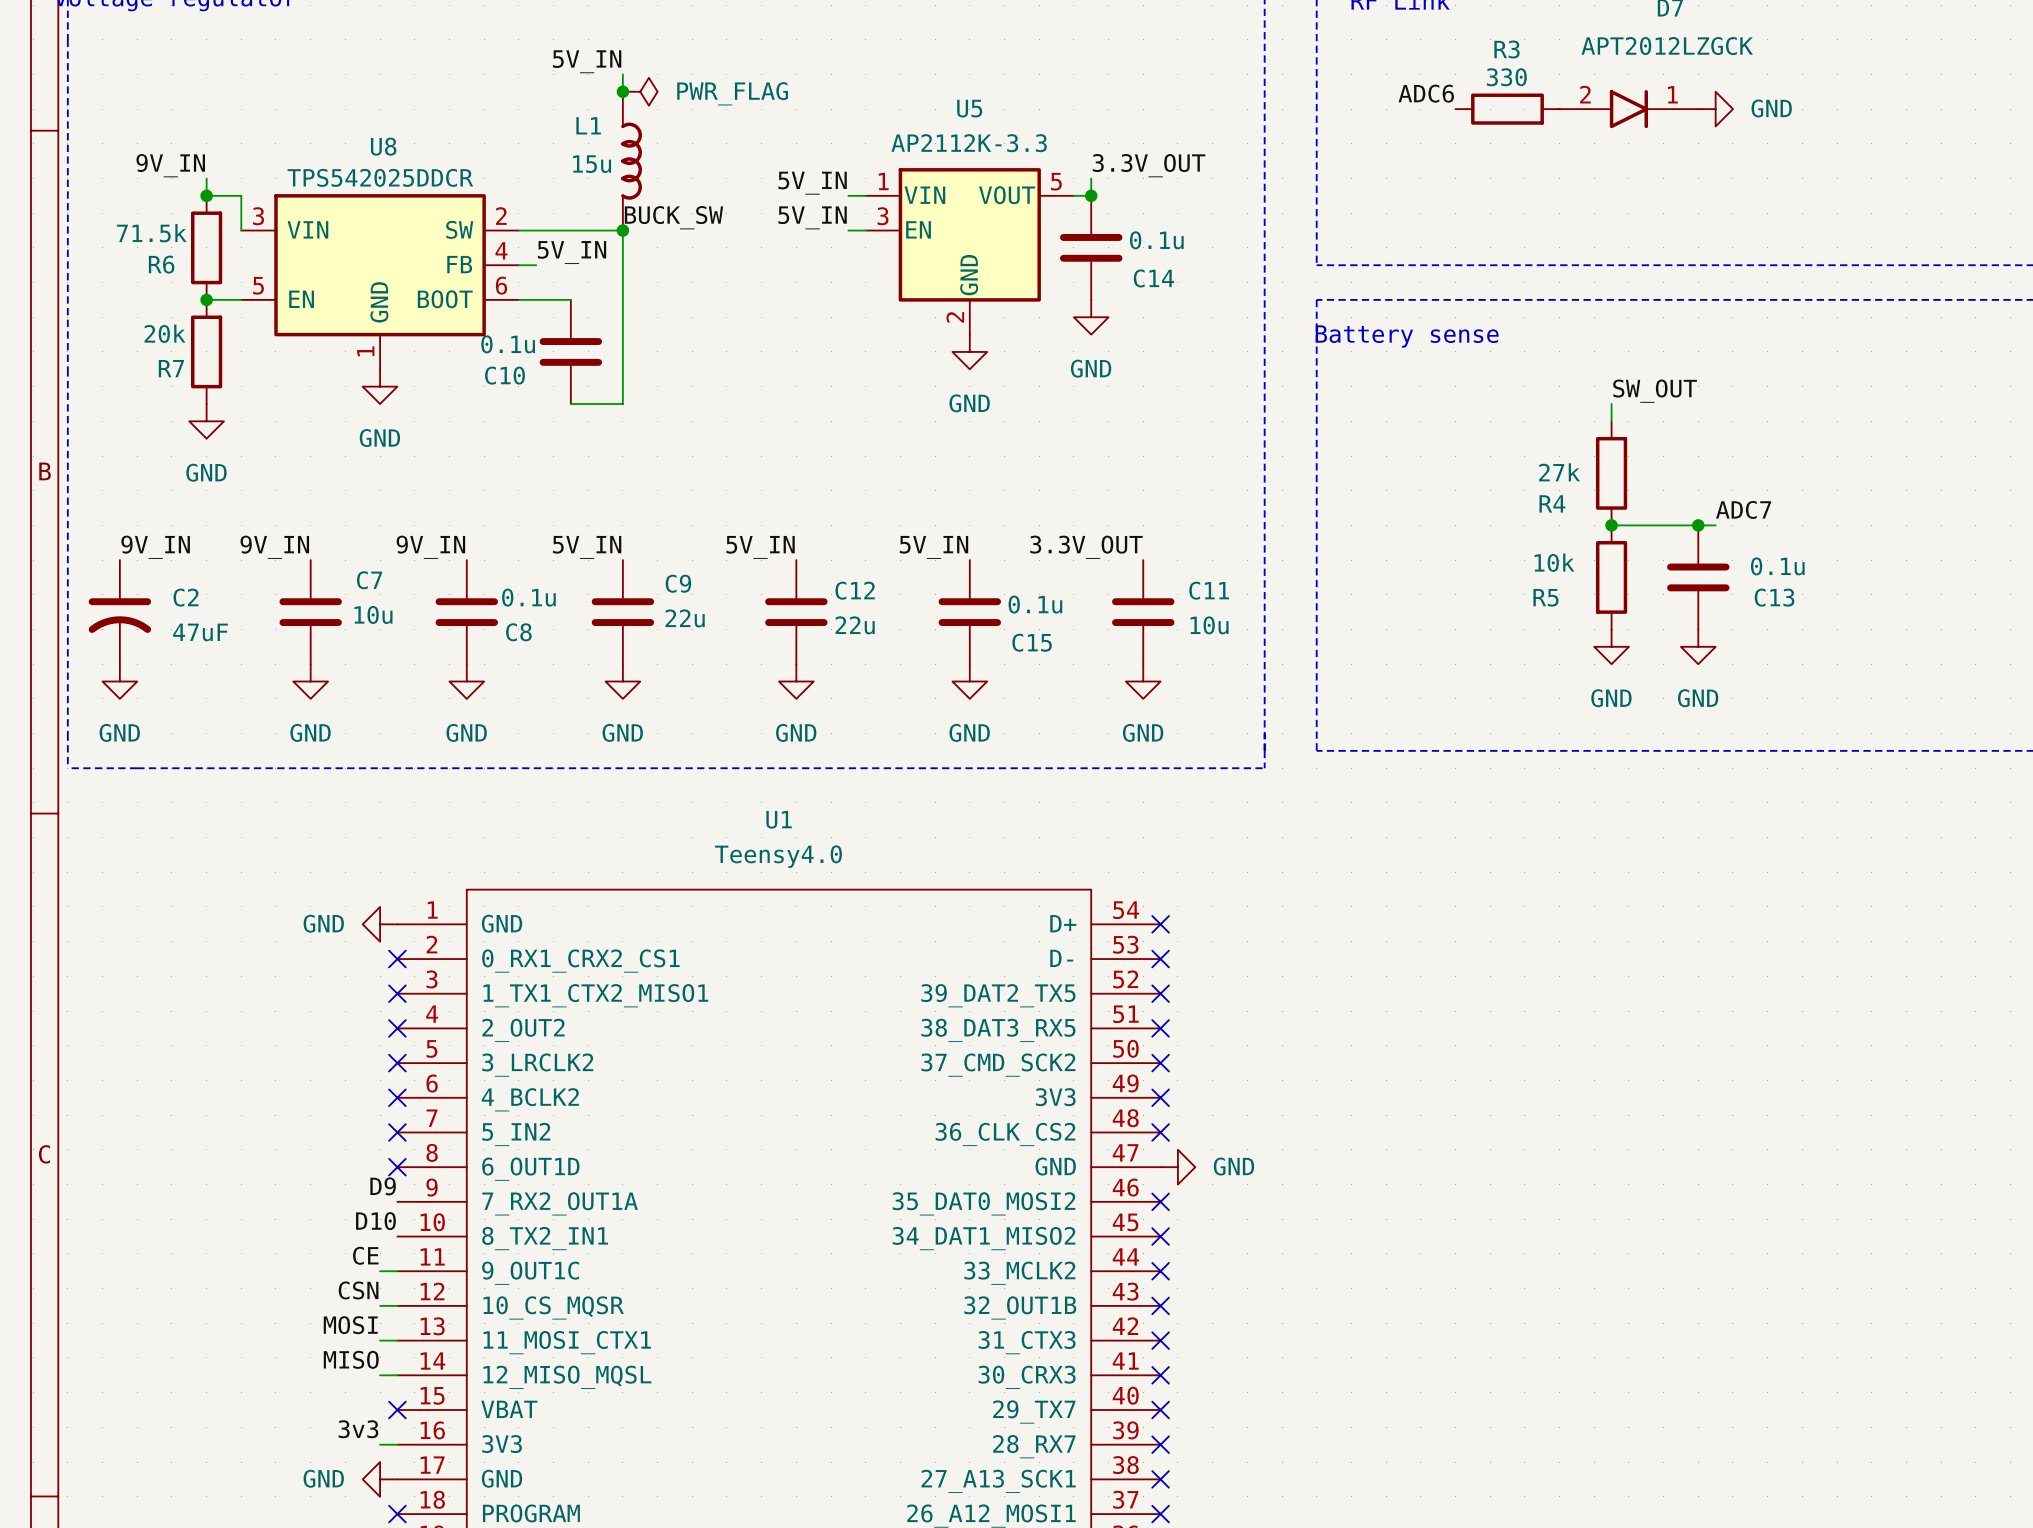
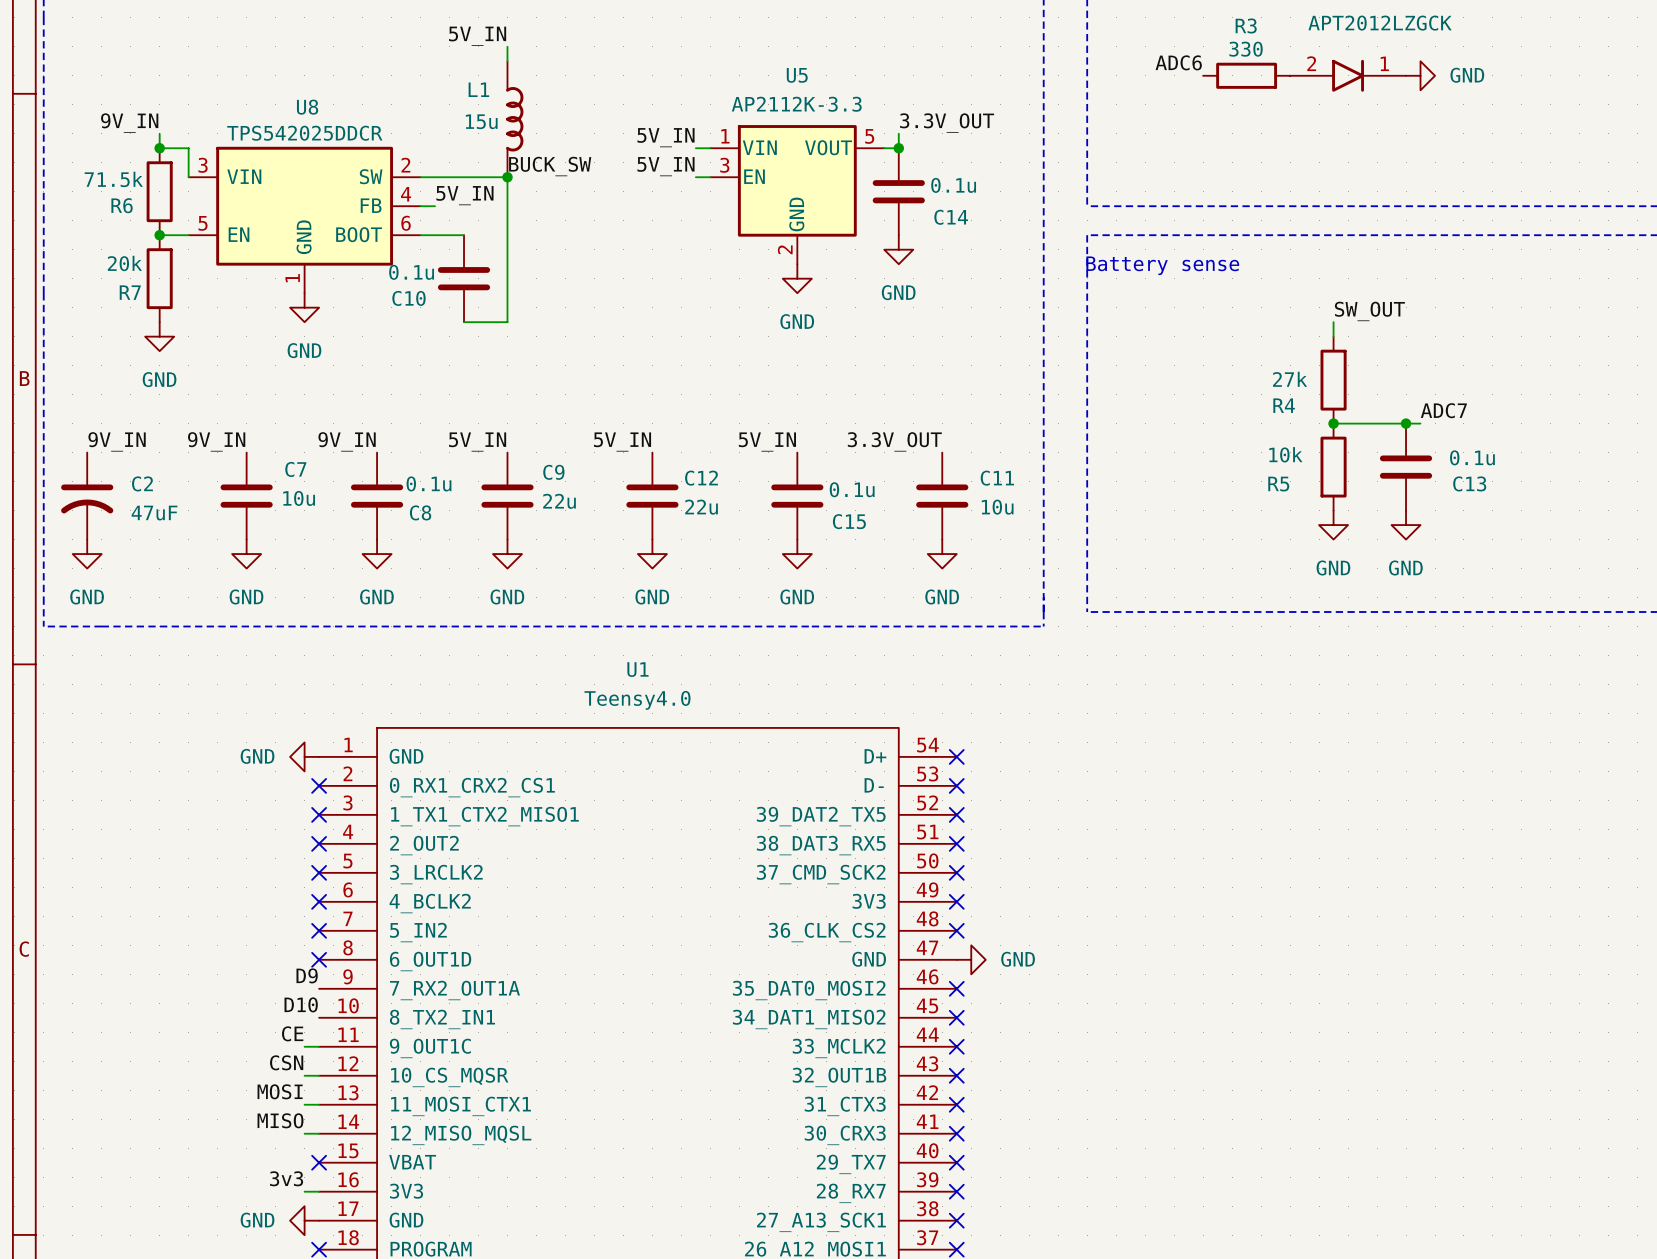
junction: (622, 91) -> none
power symbol: PWR_FLAG (640, 91) -> none

